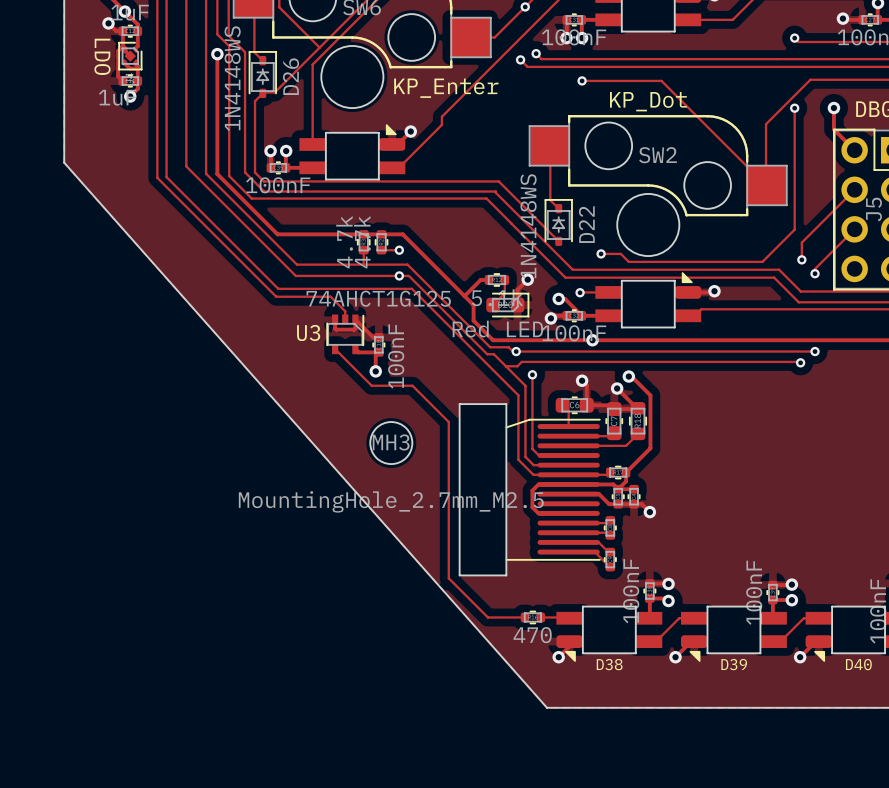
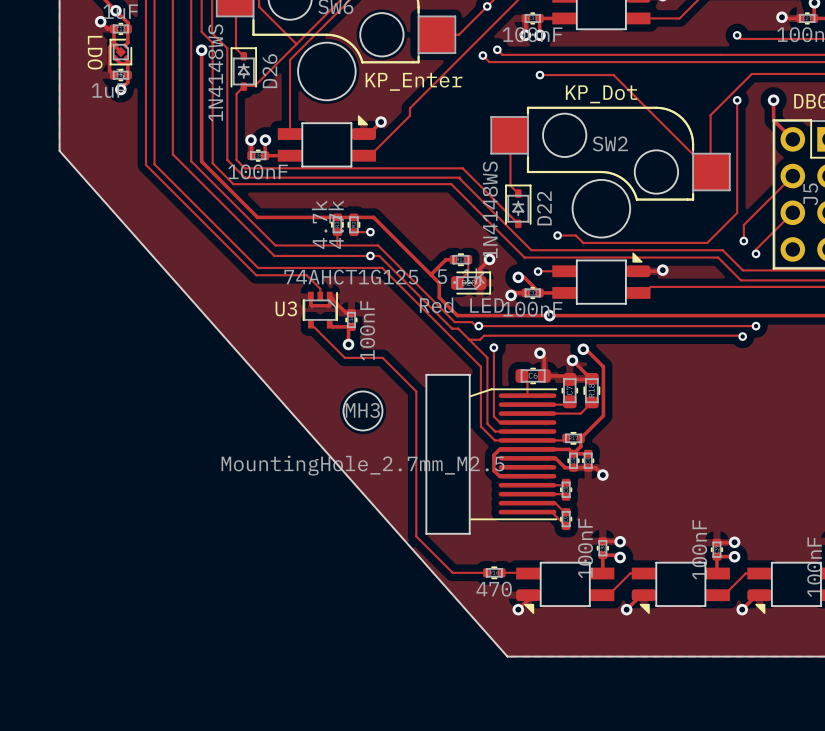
D38 name: D38 (609, 664) -> none
D39 name: D39 (734, 664) -> none
D40 name: D40 (858, 664) -> none

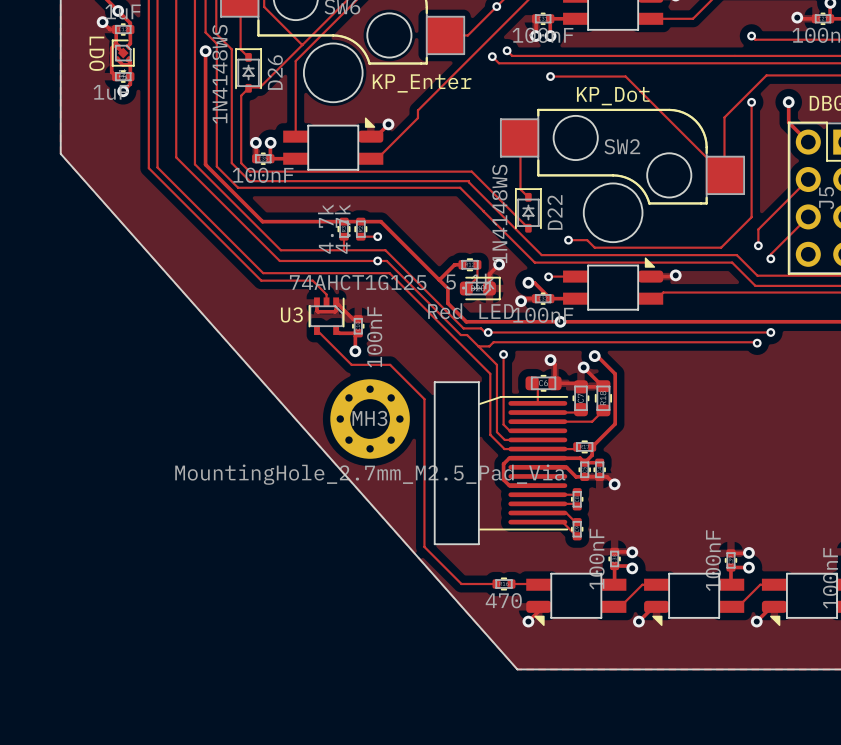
MH3 footprint: [343, 391, 383, 431] -> [330, 379, 410, 459]
MH3 value: MountingHole_2.7mm_M2.5 (363, 465) -> MountingHole_2.7mm_M2.5_Pad_Via (370, 474)

